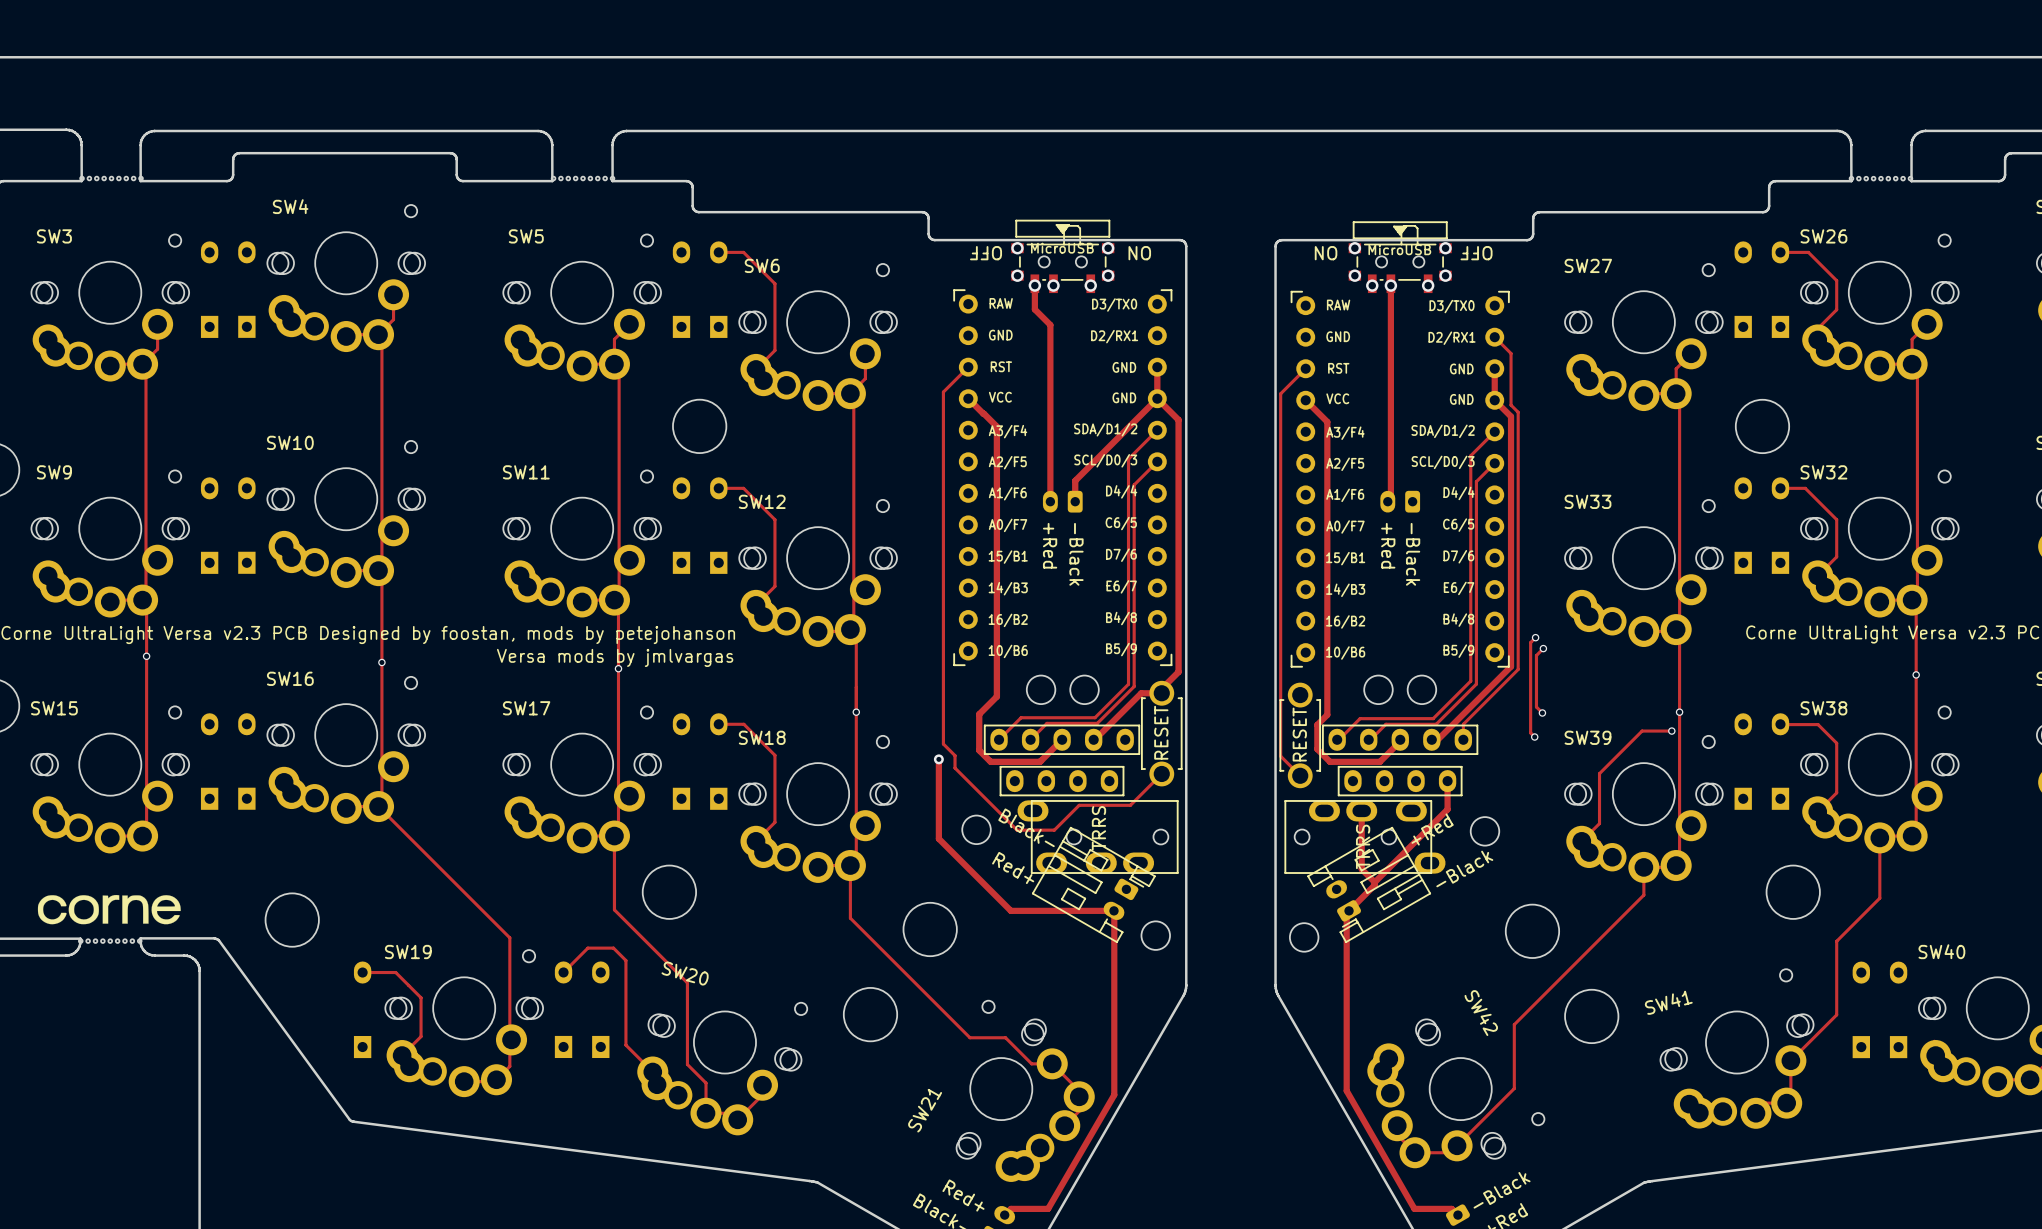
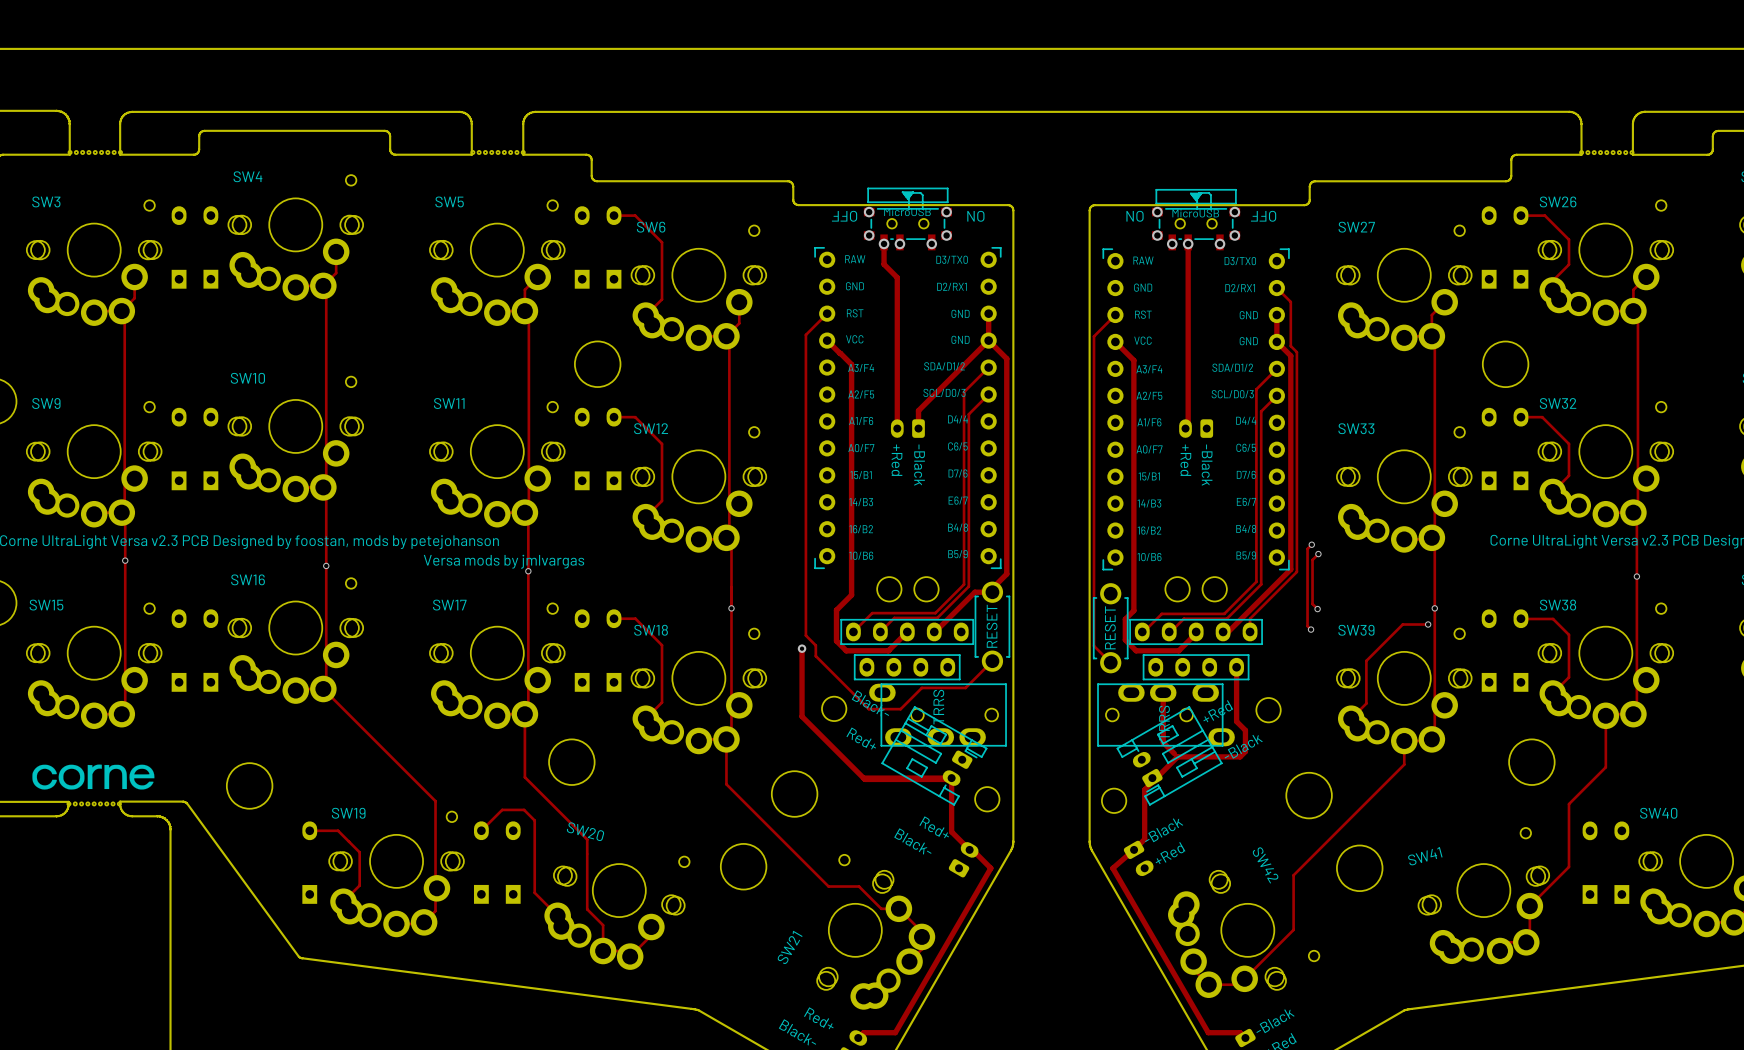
track: (1447, 809) (1346, 913) (1346, 1090) (1414, 1208) -> (1236, 691) (1236, 721) (1245, 730) (1245, 751) (1240, 756) (1177, 756) (1144, 789) (1144, 839) (1112, 868) (1208, 1032)
track: (1113, 915) (1114, 1094) -> (863, 778) (951, 779) (951, 831) (990, 868) (951, 935)
text: none -> -Black (1164, 830)
text: none -> Red+ (934, 827)
text: none -> Black- (912, 841)
text: none -> +Red (1170, 853)
part: none -> (1138, 858)
part: none -> (963, 859)

